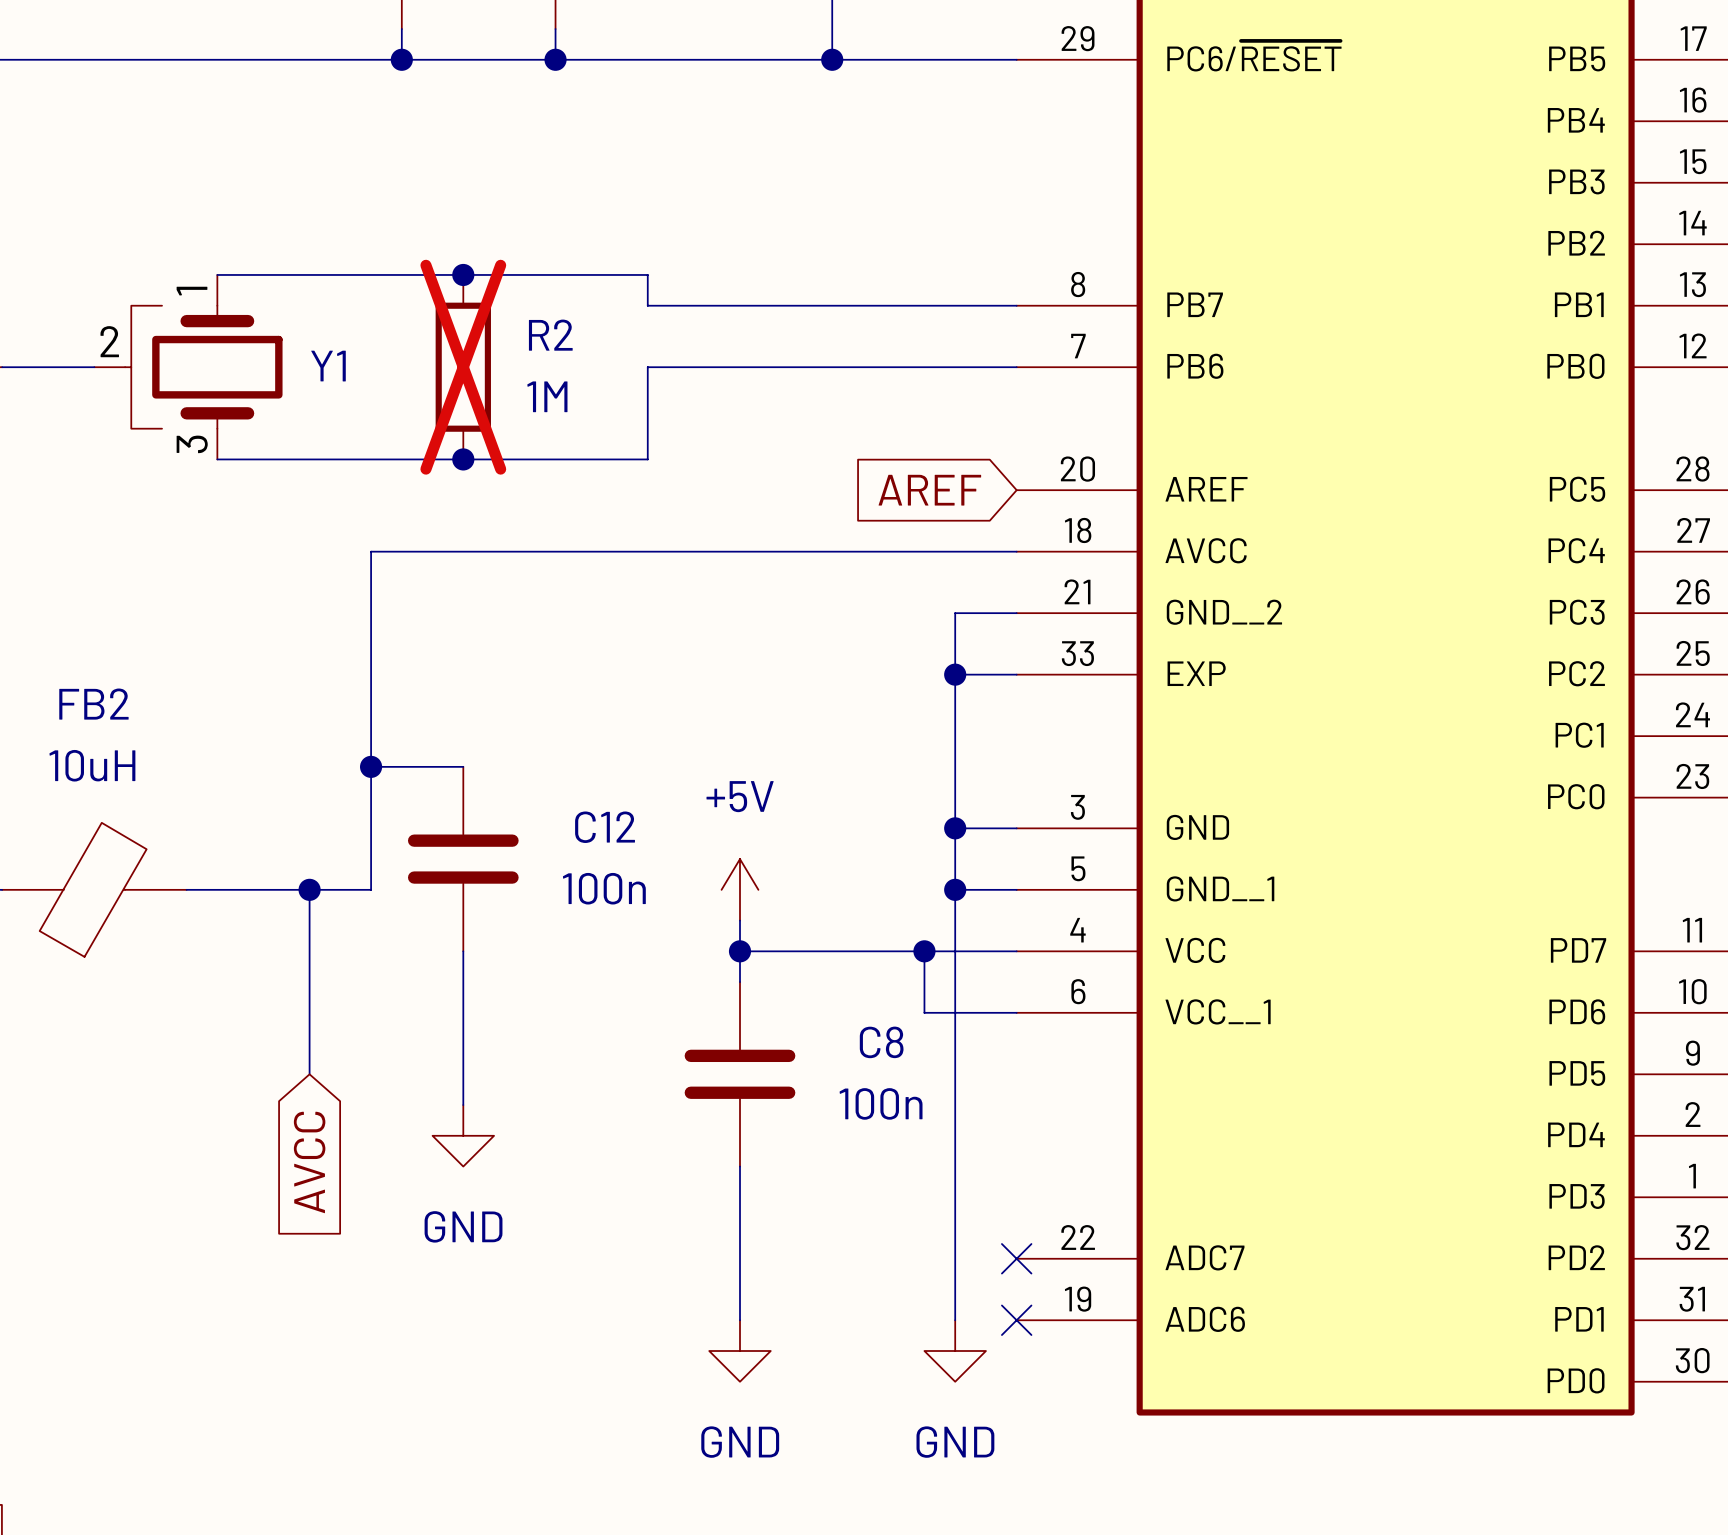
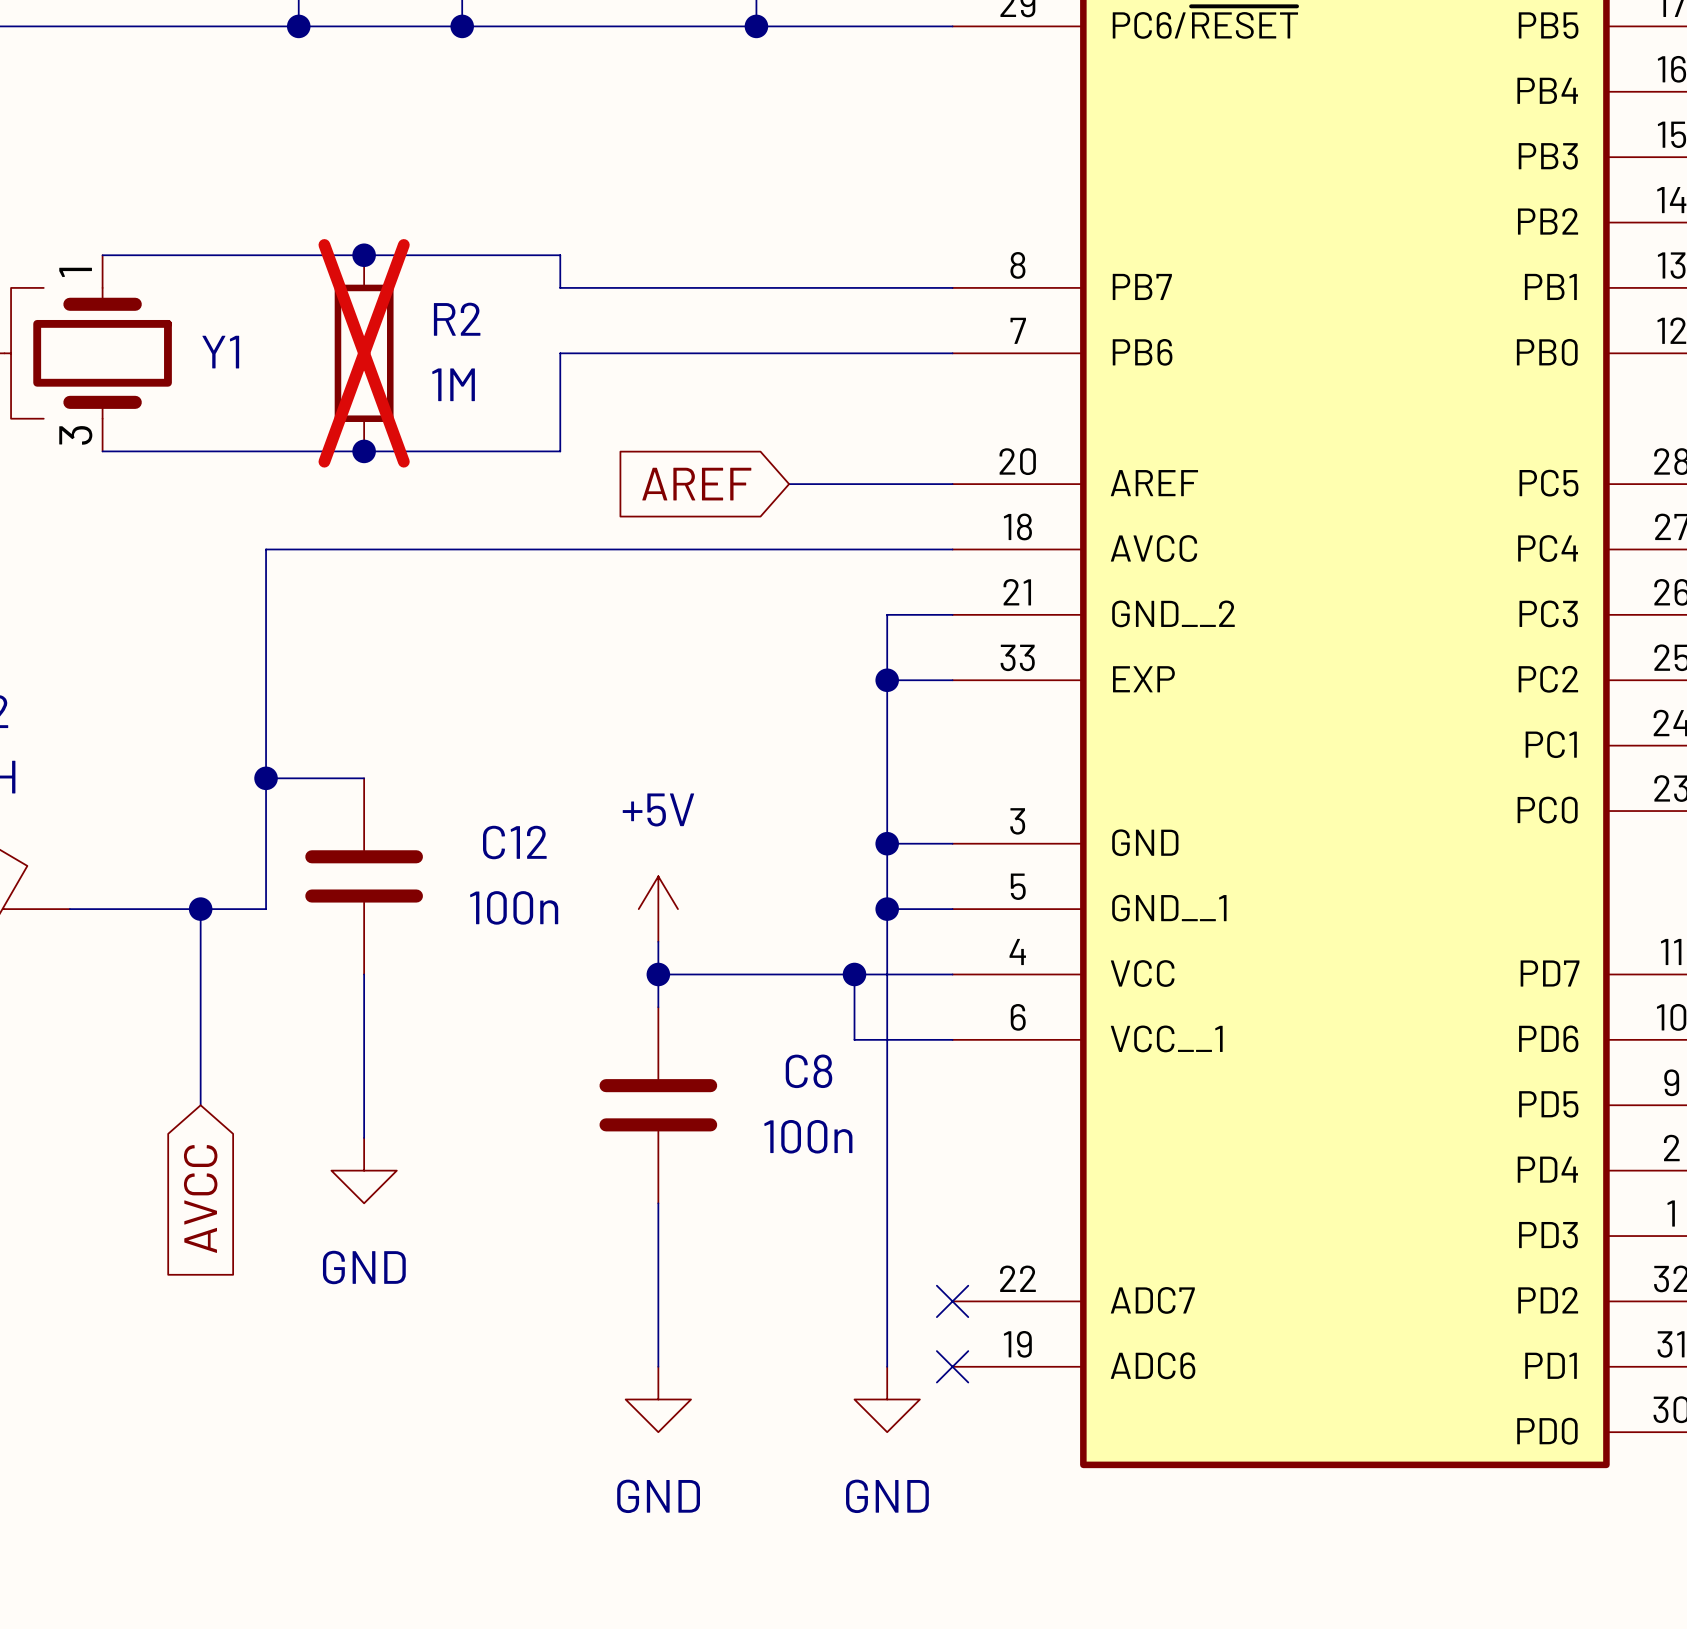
wire: none -> (789, 484) (952, 484)
global label position: AREF (929, 490) -> AREF (696, 484)

